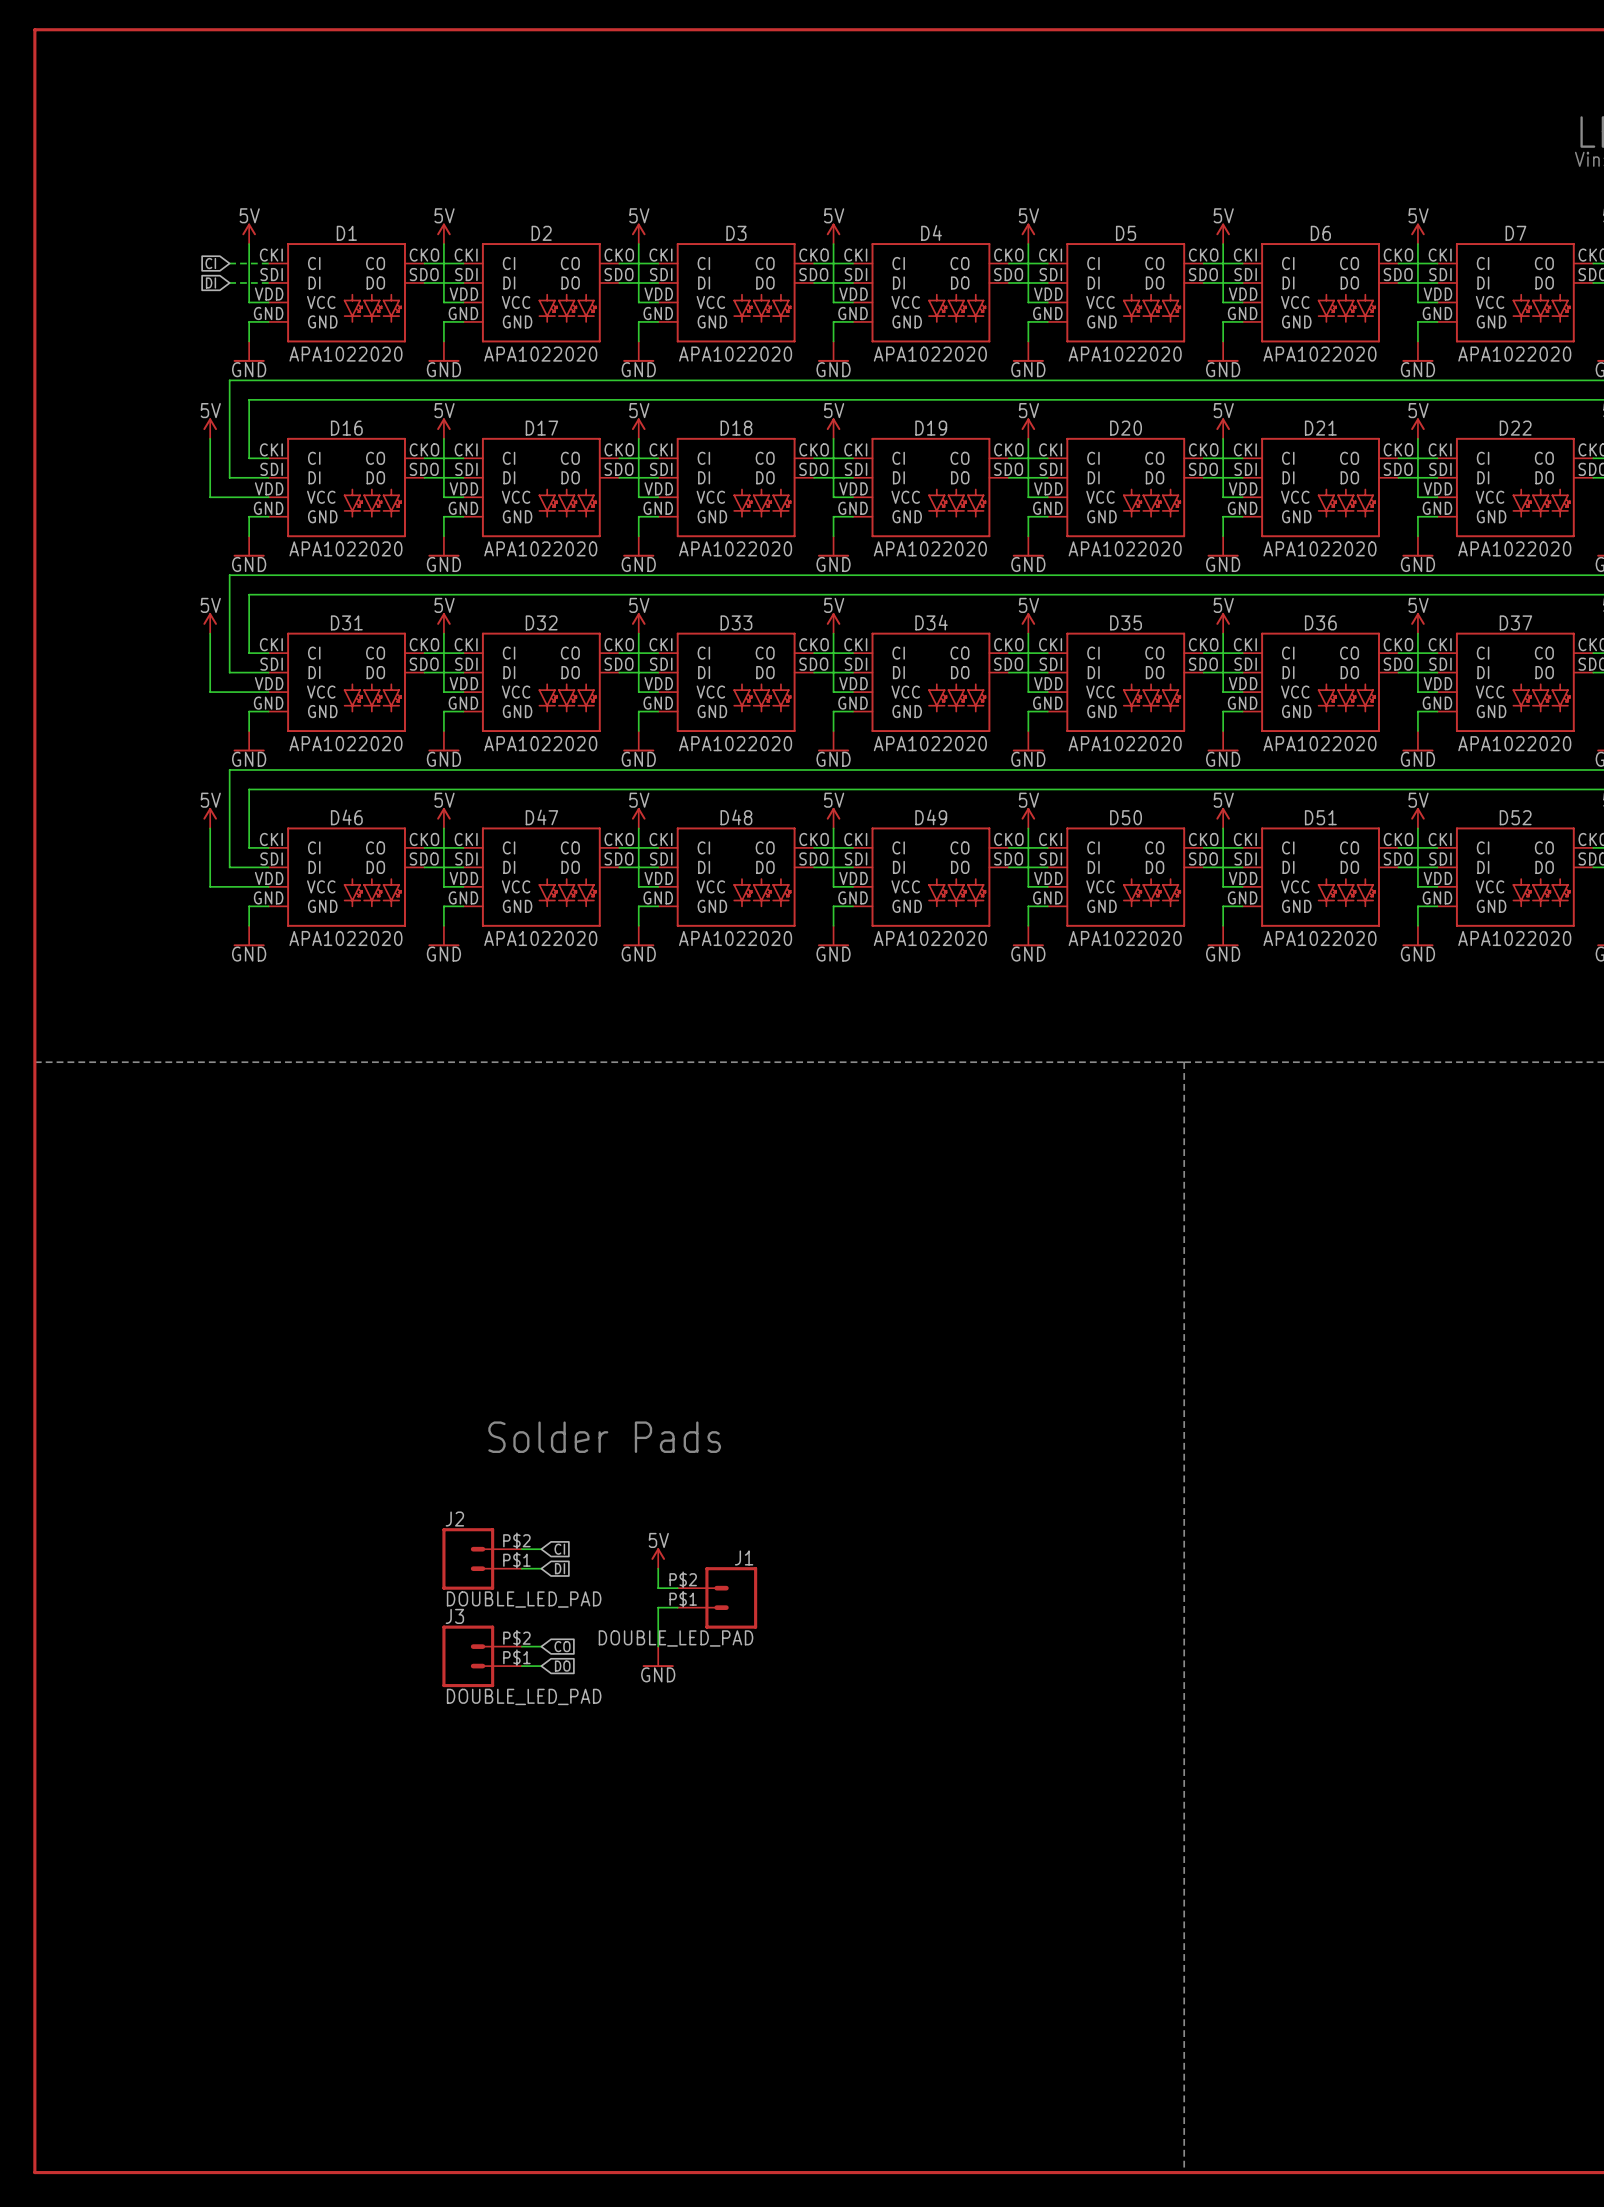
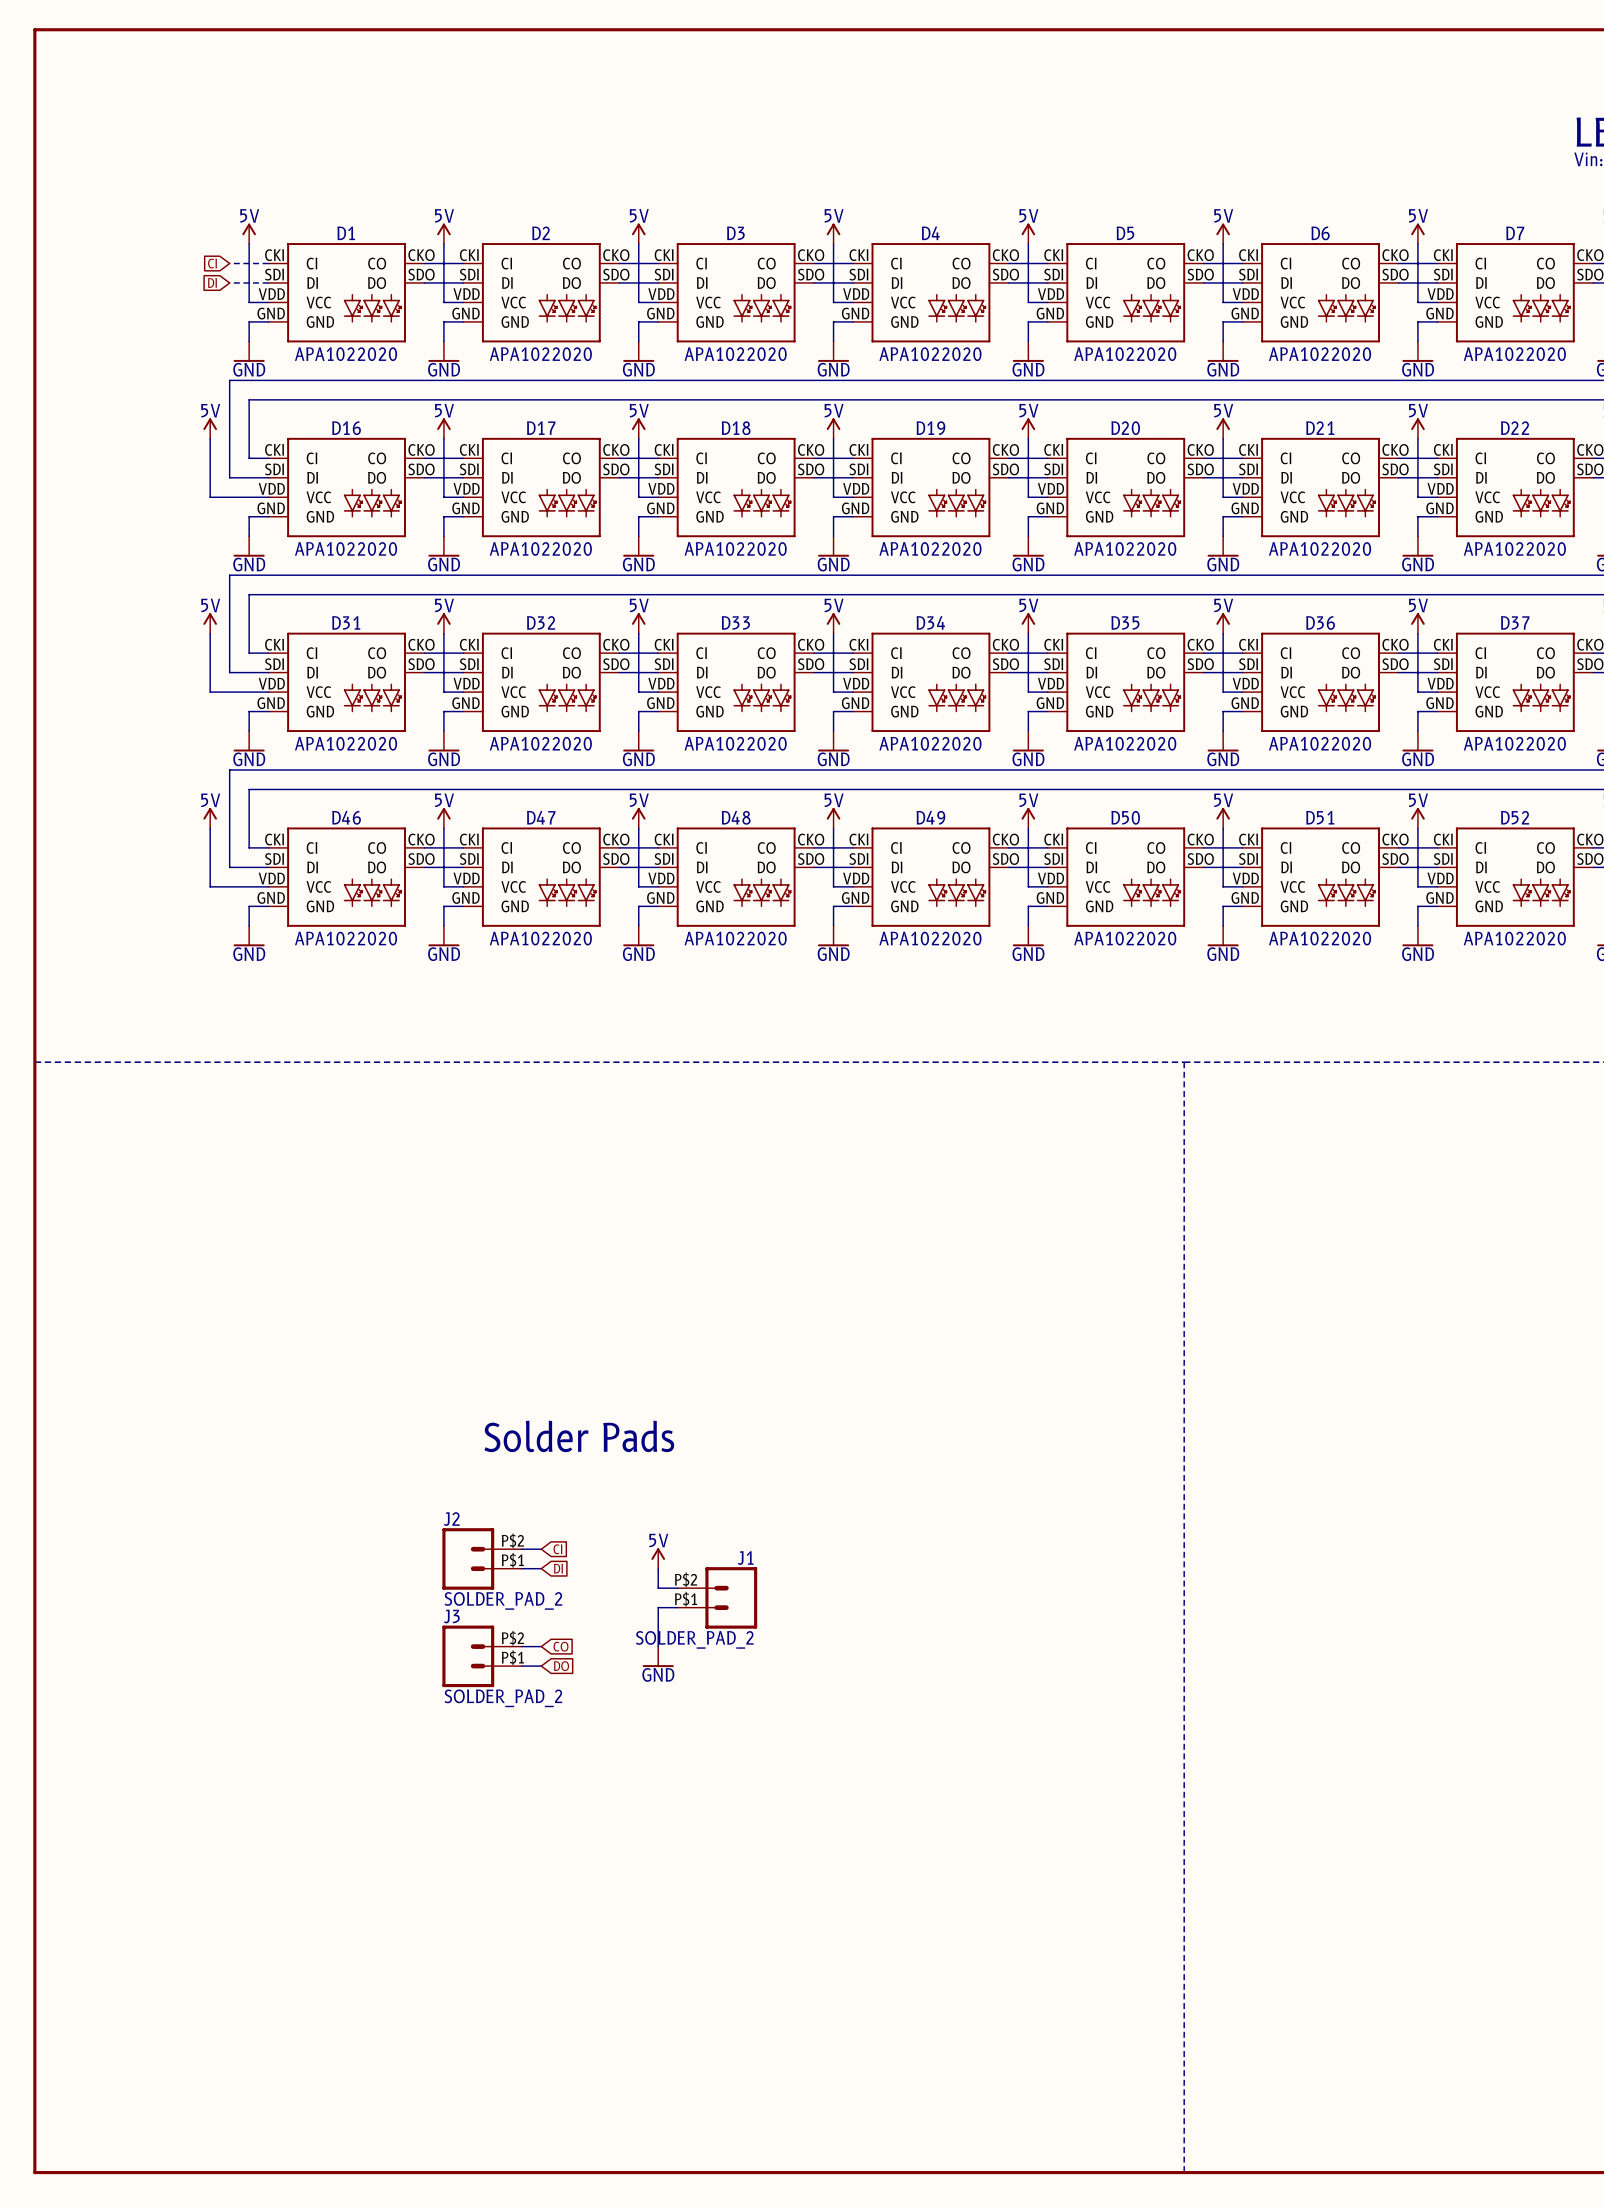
J2 value: DOUBLE_LED_PAD (524, 1599) -> SOLDER_PAD_2 (503, 1600)
J1 value: DOUBLE_LED_PAD (676, 1638) -> SOLDER_PAD_2 (694, 1639)
J3 value: DOUBLE_LED_PAD (524, 1696) -> SOLDER_PAD_2 (503, 1698)

